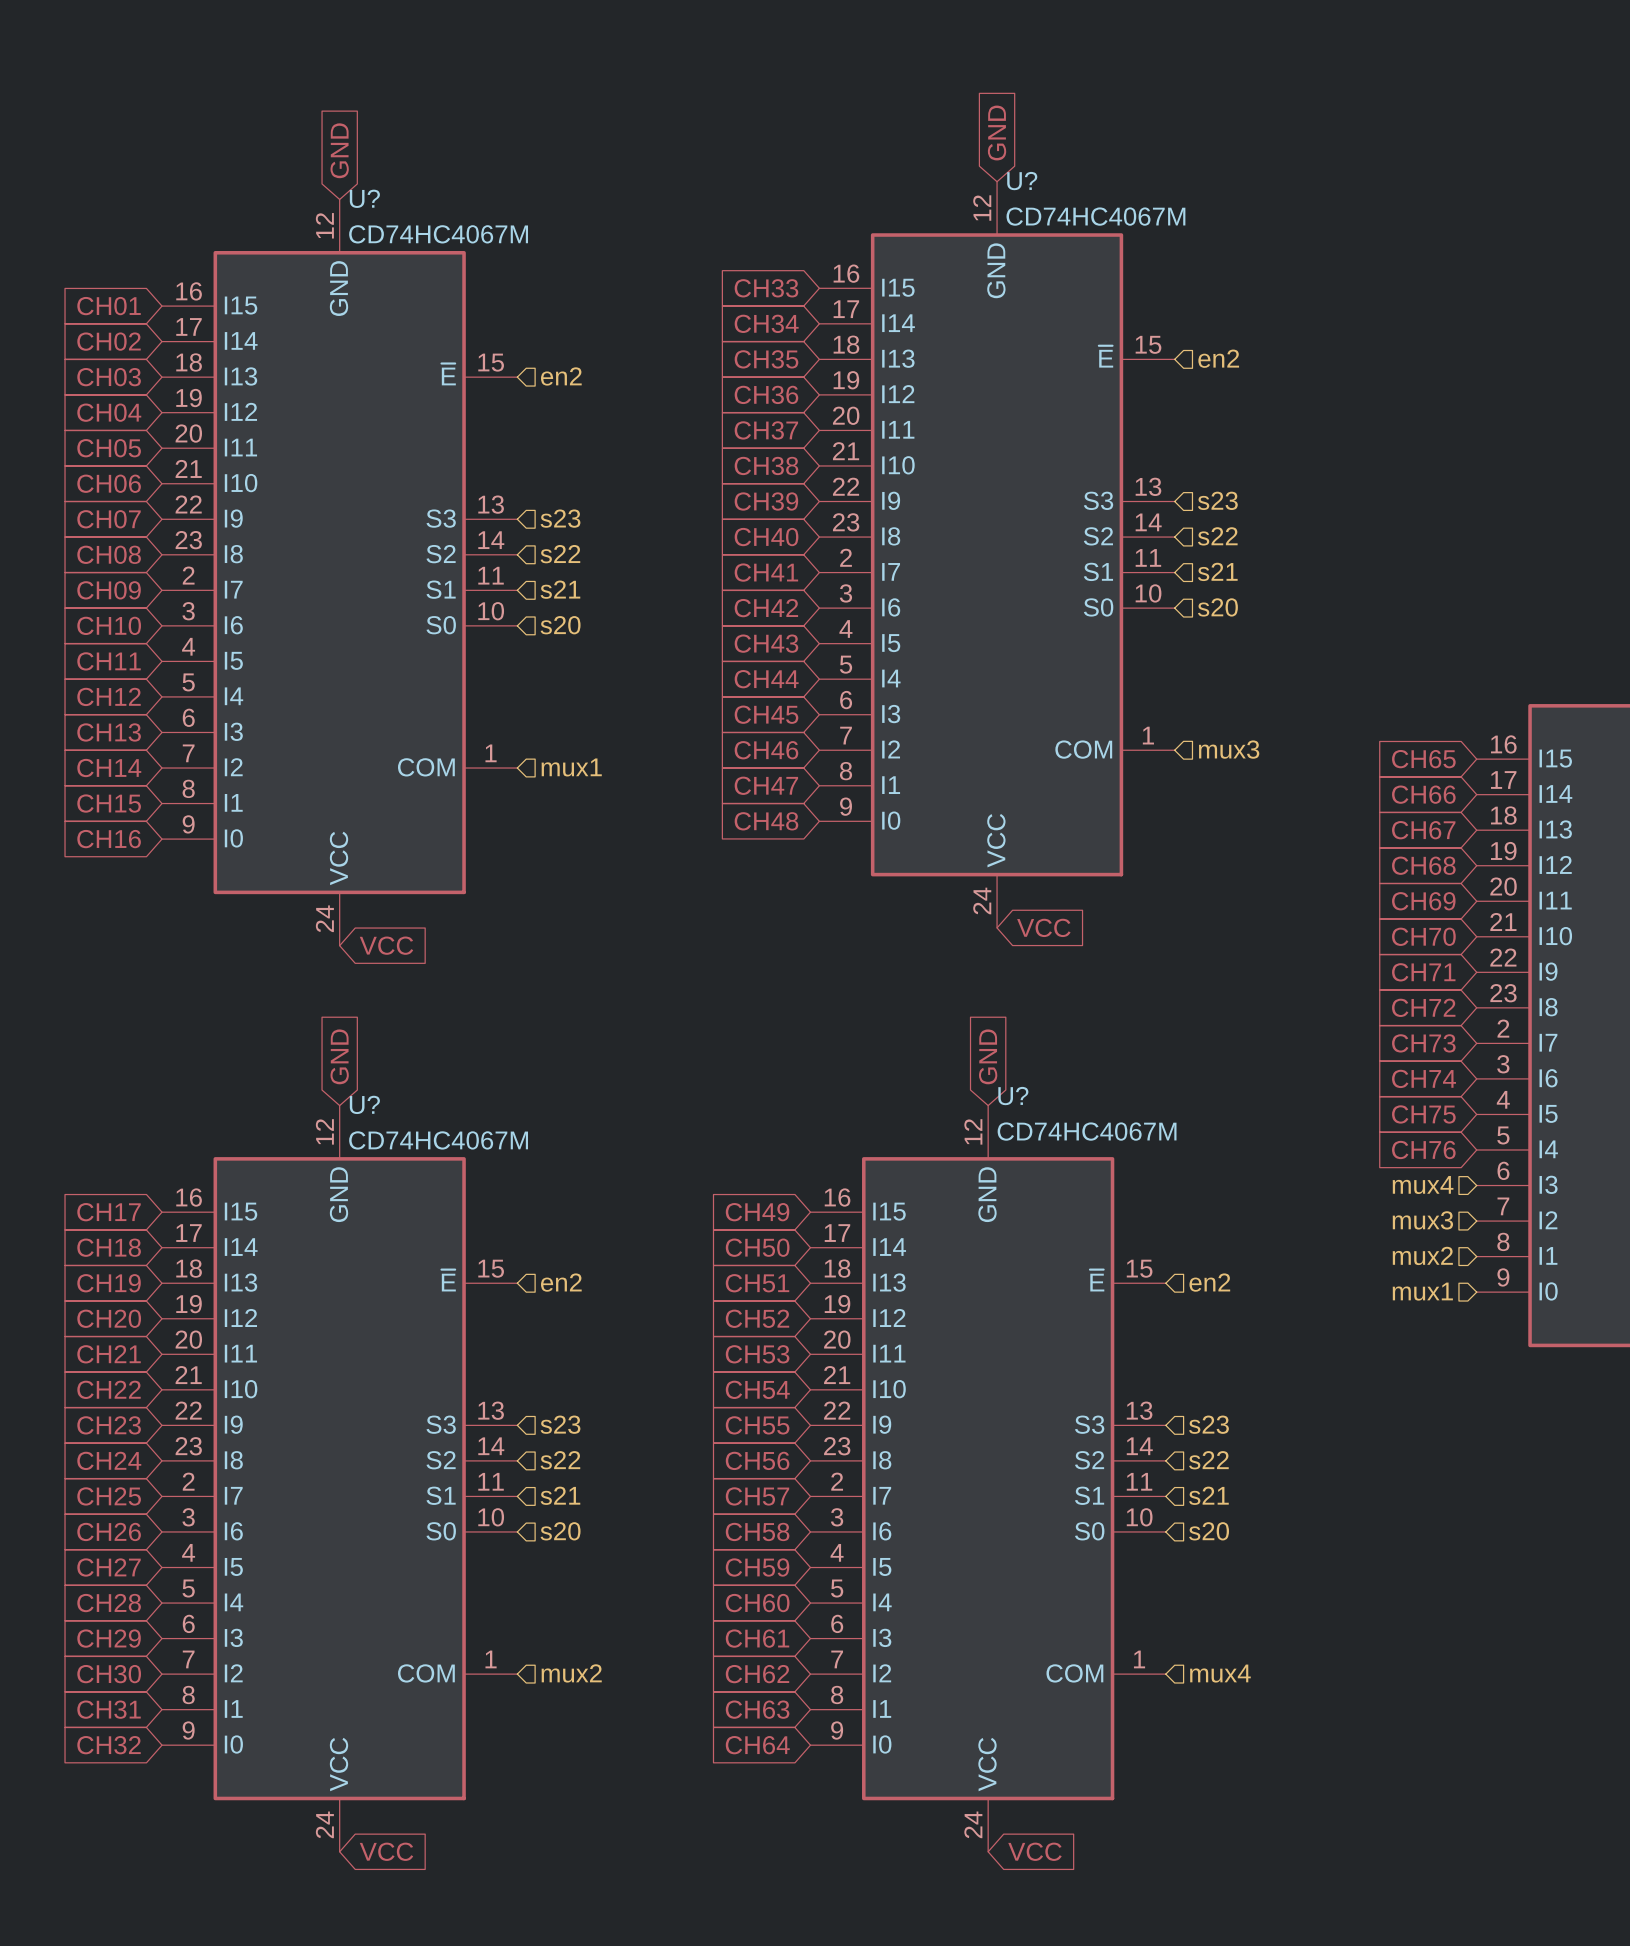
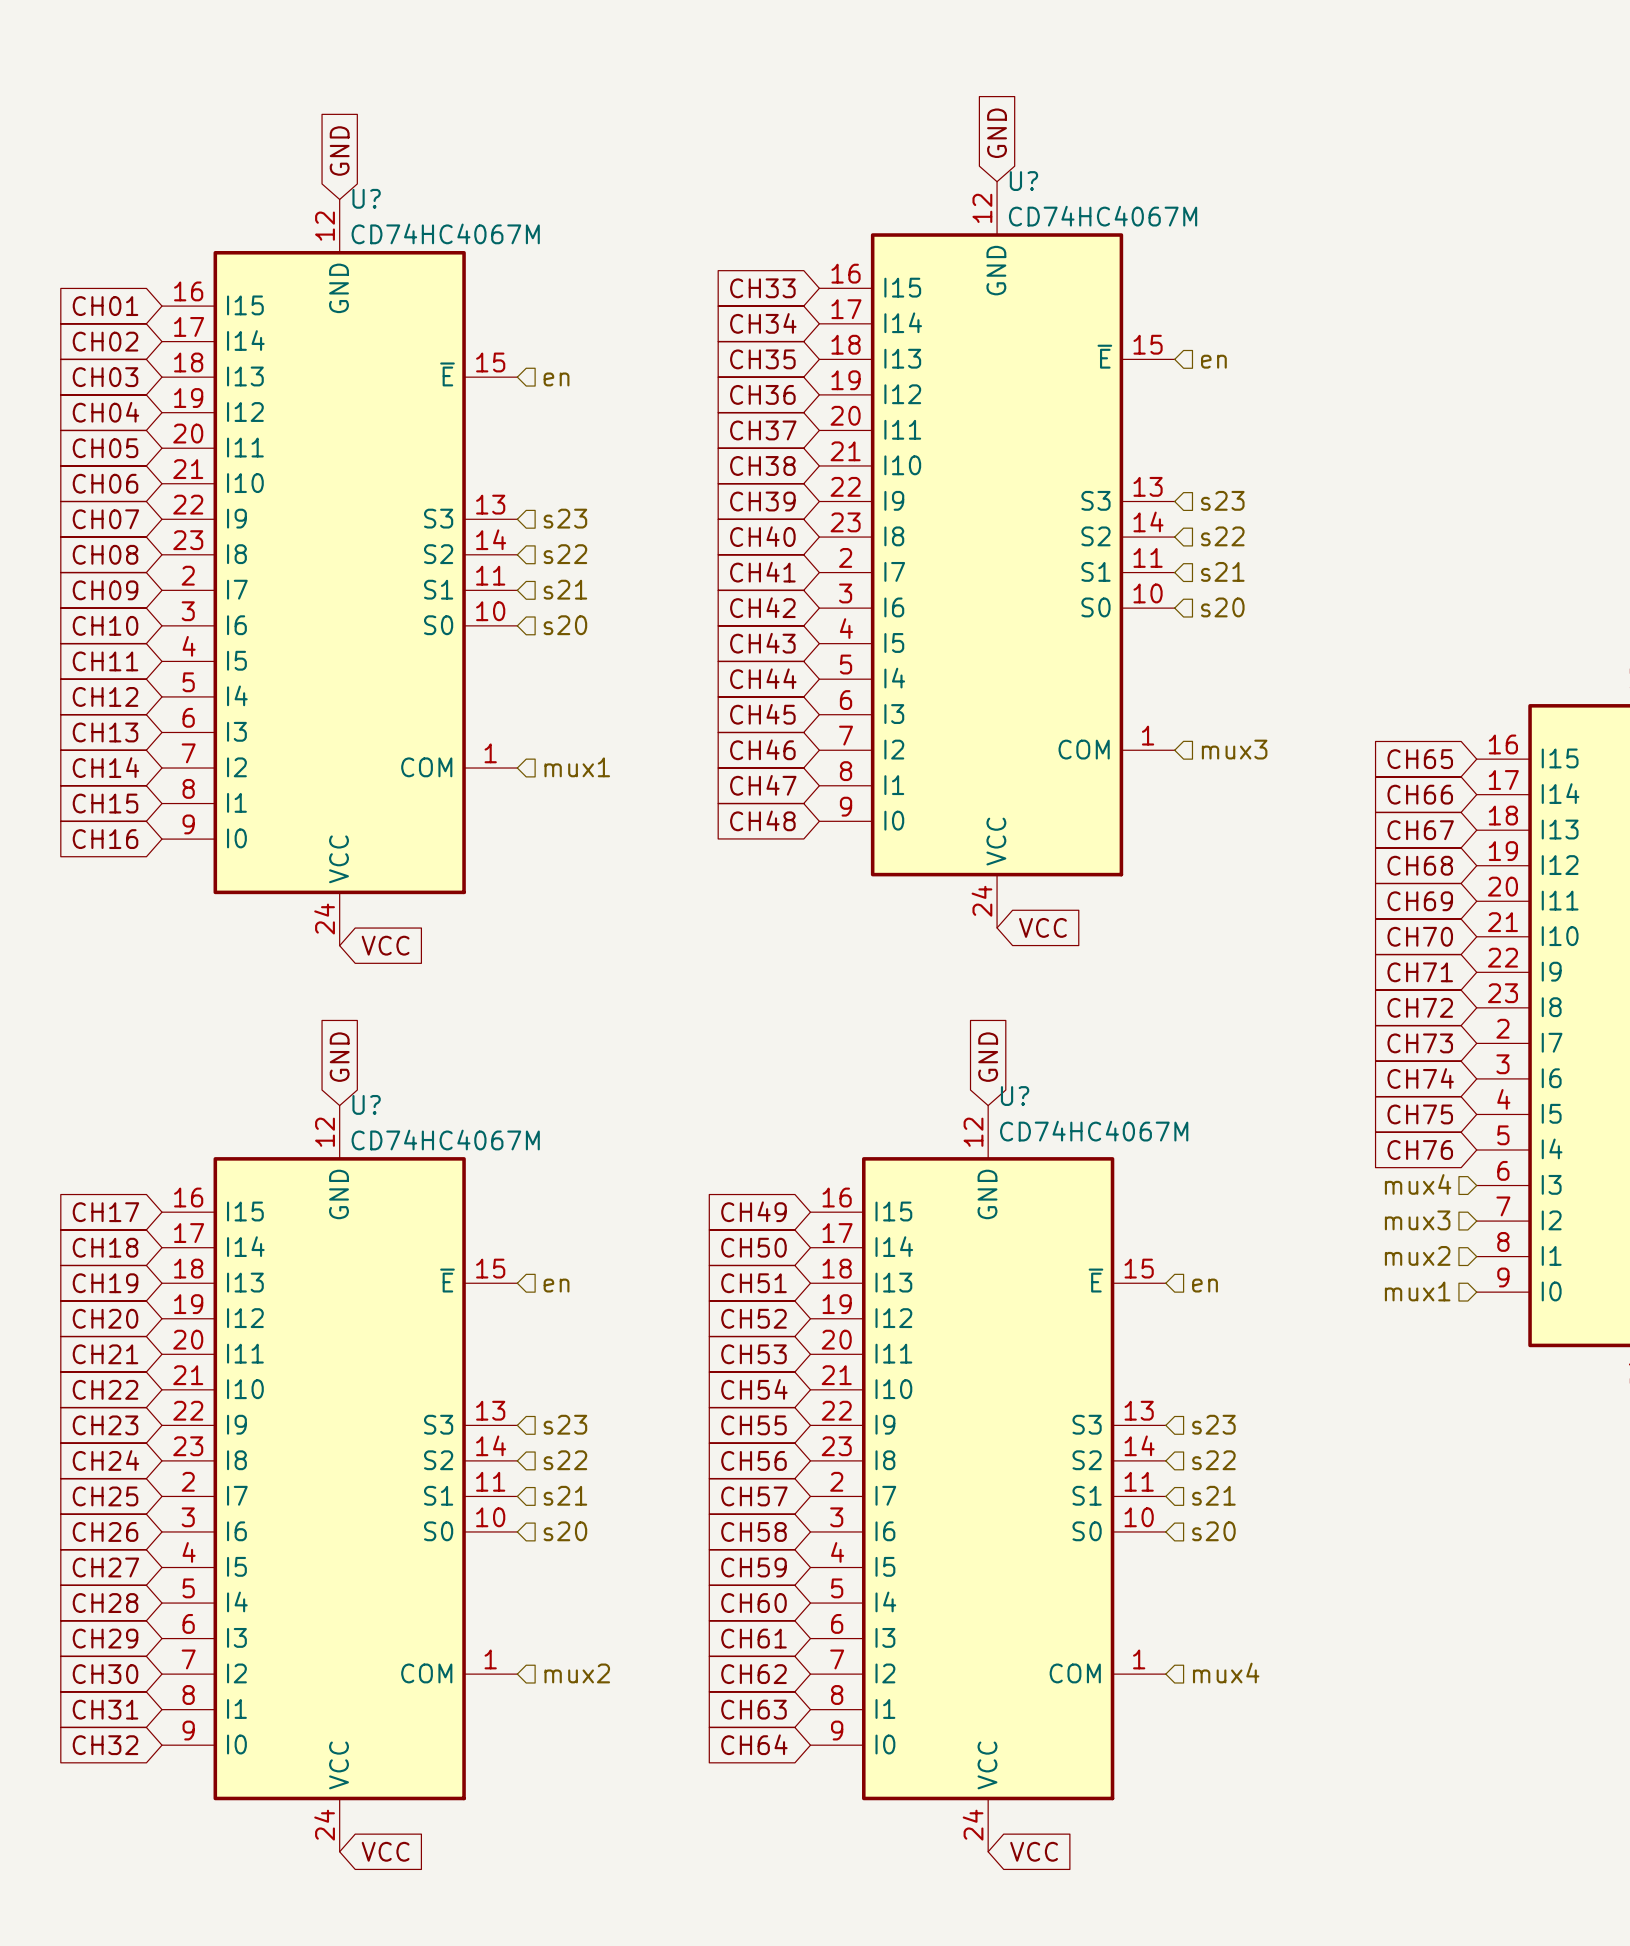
hierarchical label: en2 (1218, 358) -> en (1213, 361)
hierarchical label: en2 (561, 376) -> en (556, 379)
hierarchical label: en2 (561, 1282) -> en (556, 1285)
hierarchical label: en2 (1209, 1282) -> en (1205, 1285)

